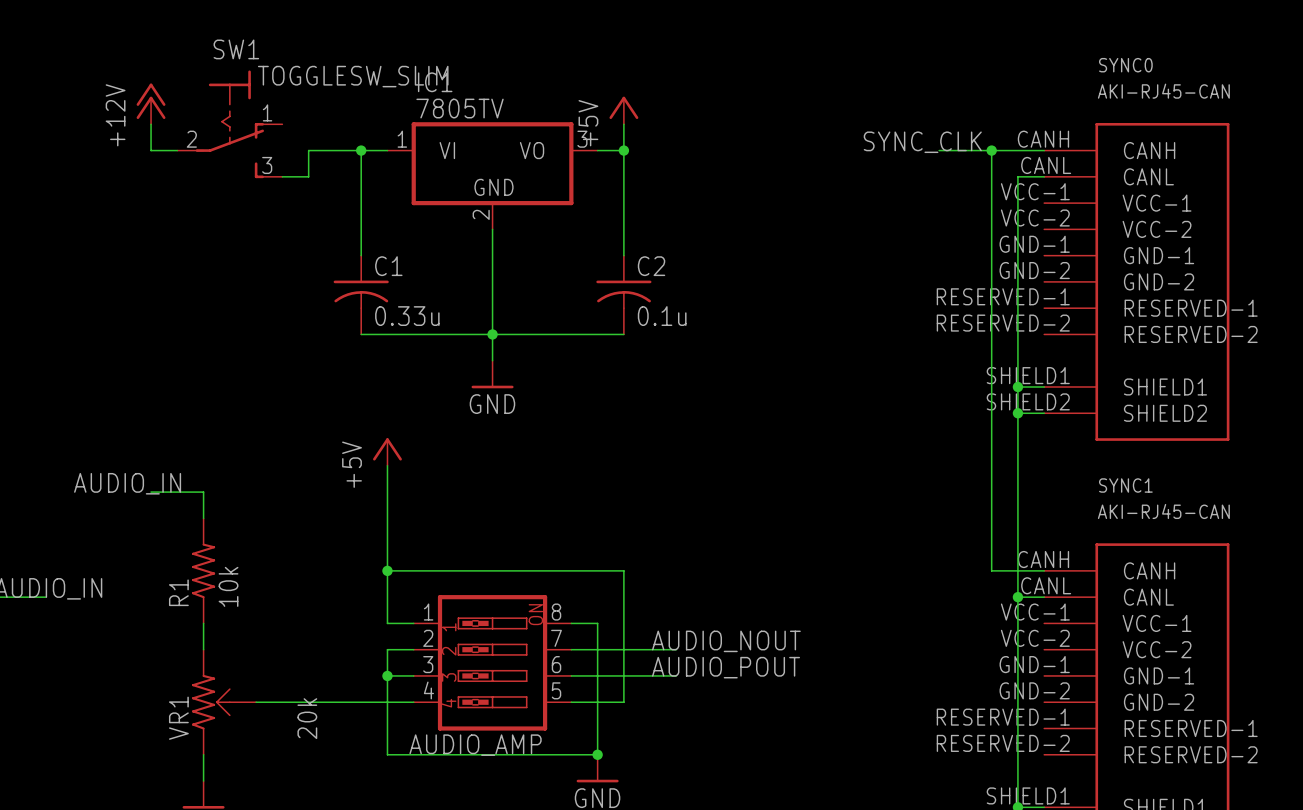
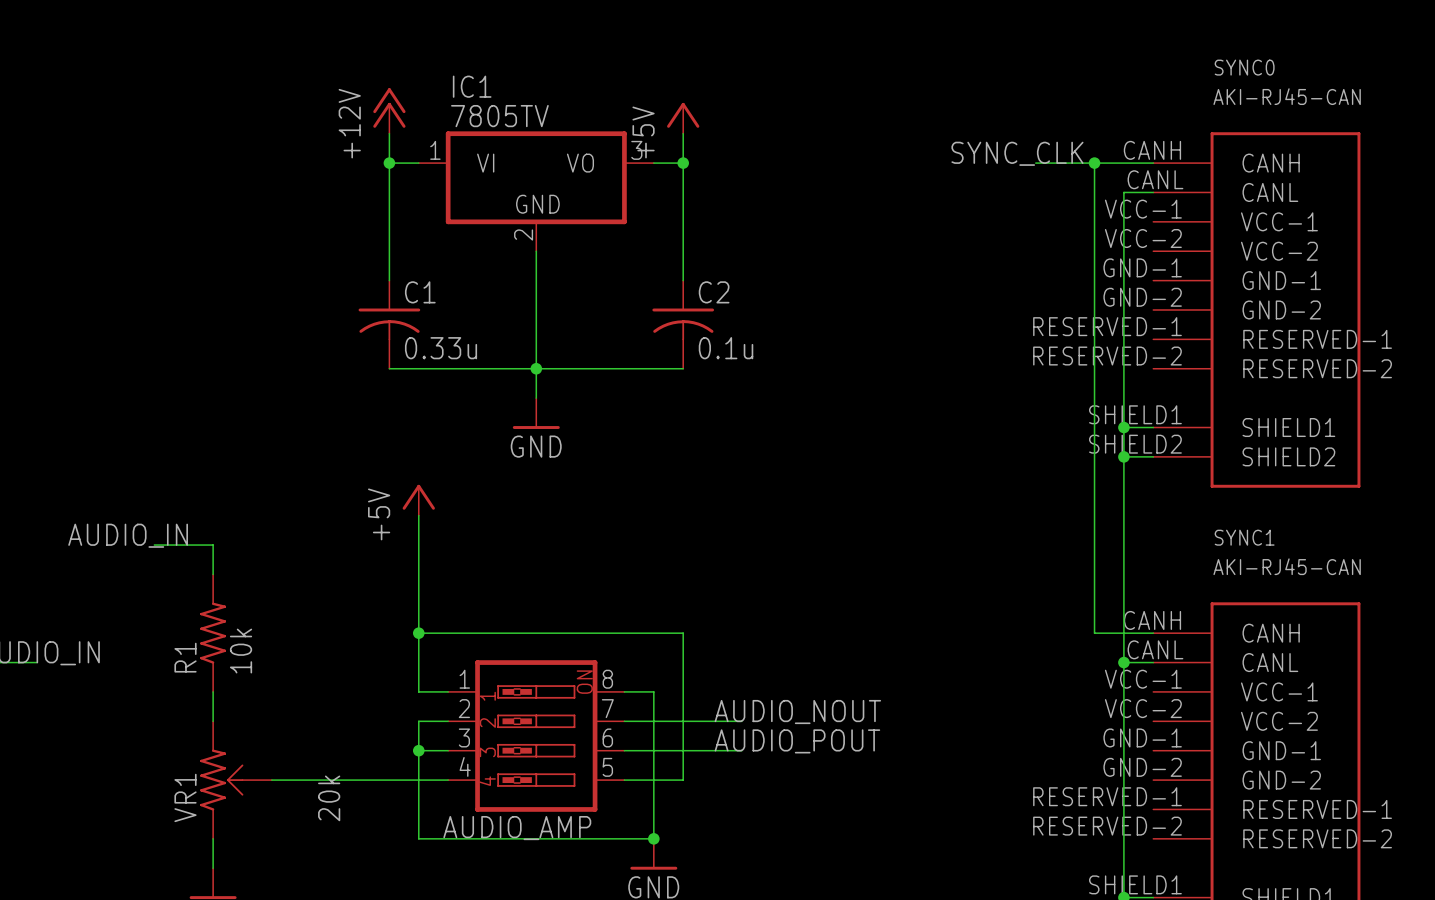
power symbol position: +12V (151, 103) -> +12V (389, 110)
wire: (151, 124) (151, 150) (177, 150) -> none
SW1: TOGGLESW_SLIM (229, 124) -> none
wire: (361, 150) (308, 150) (308, 176) (282, 176) -> (389, 163) (389, 133)

